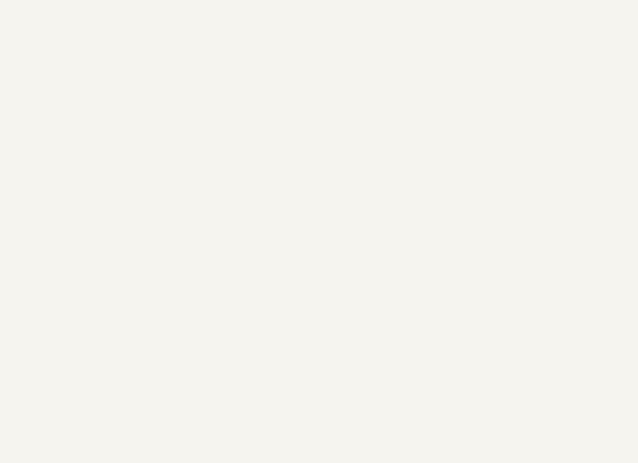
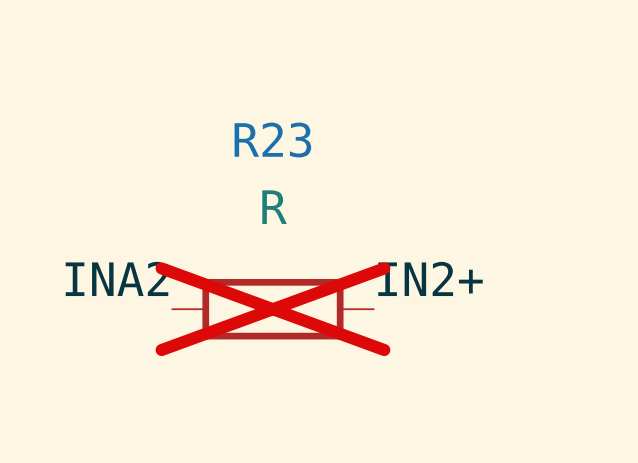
label: none -> INA2 (116, 278)
label: none -> IN2+ (430, 278)
R23: none -> R (272, 309)

